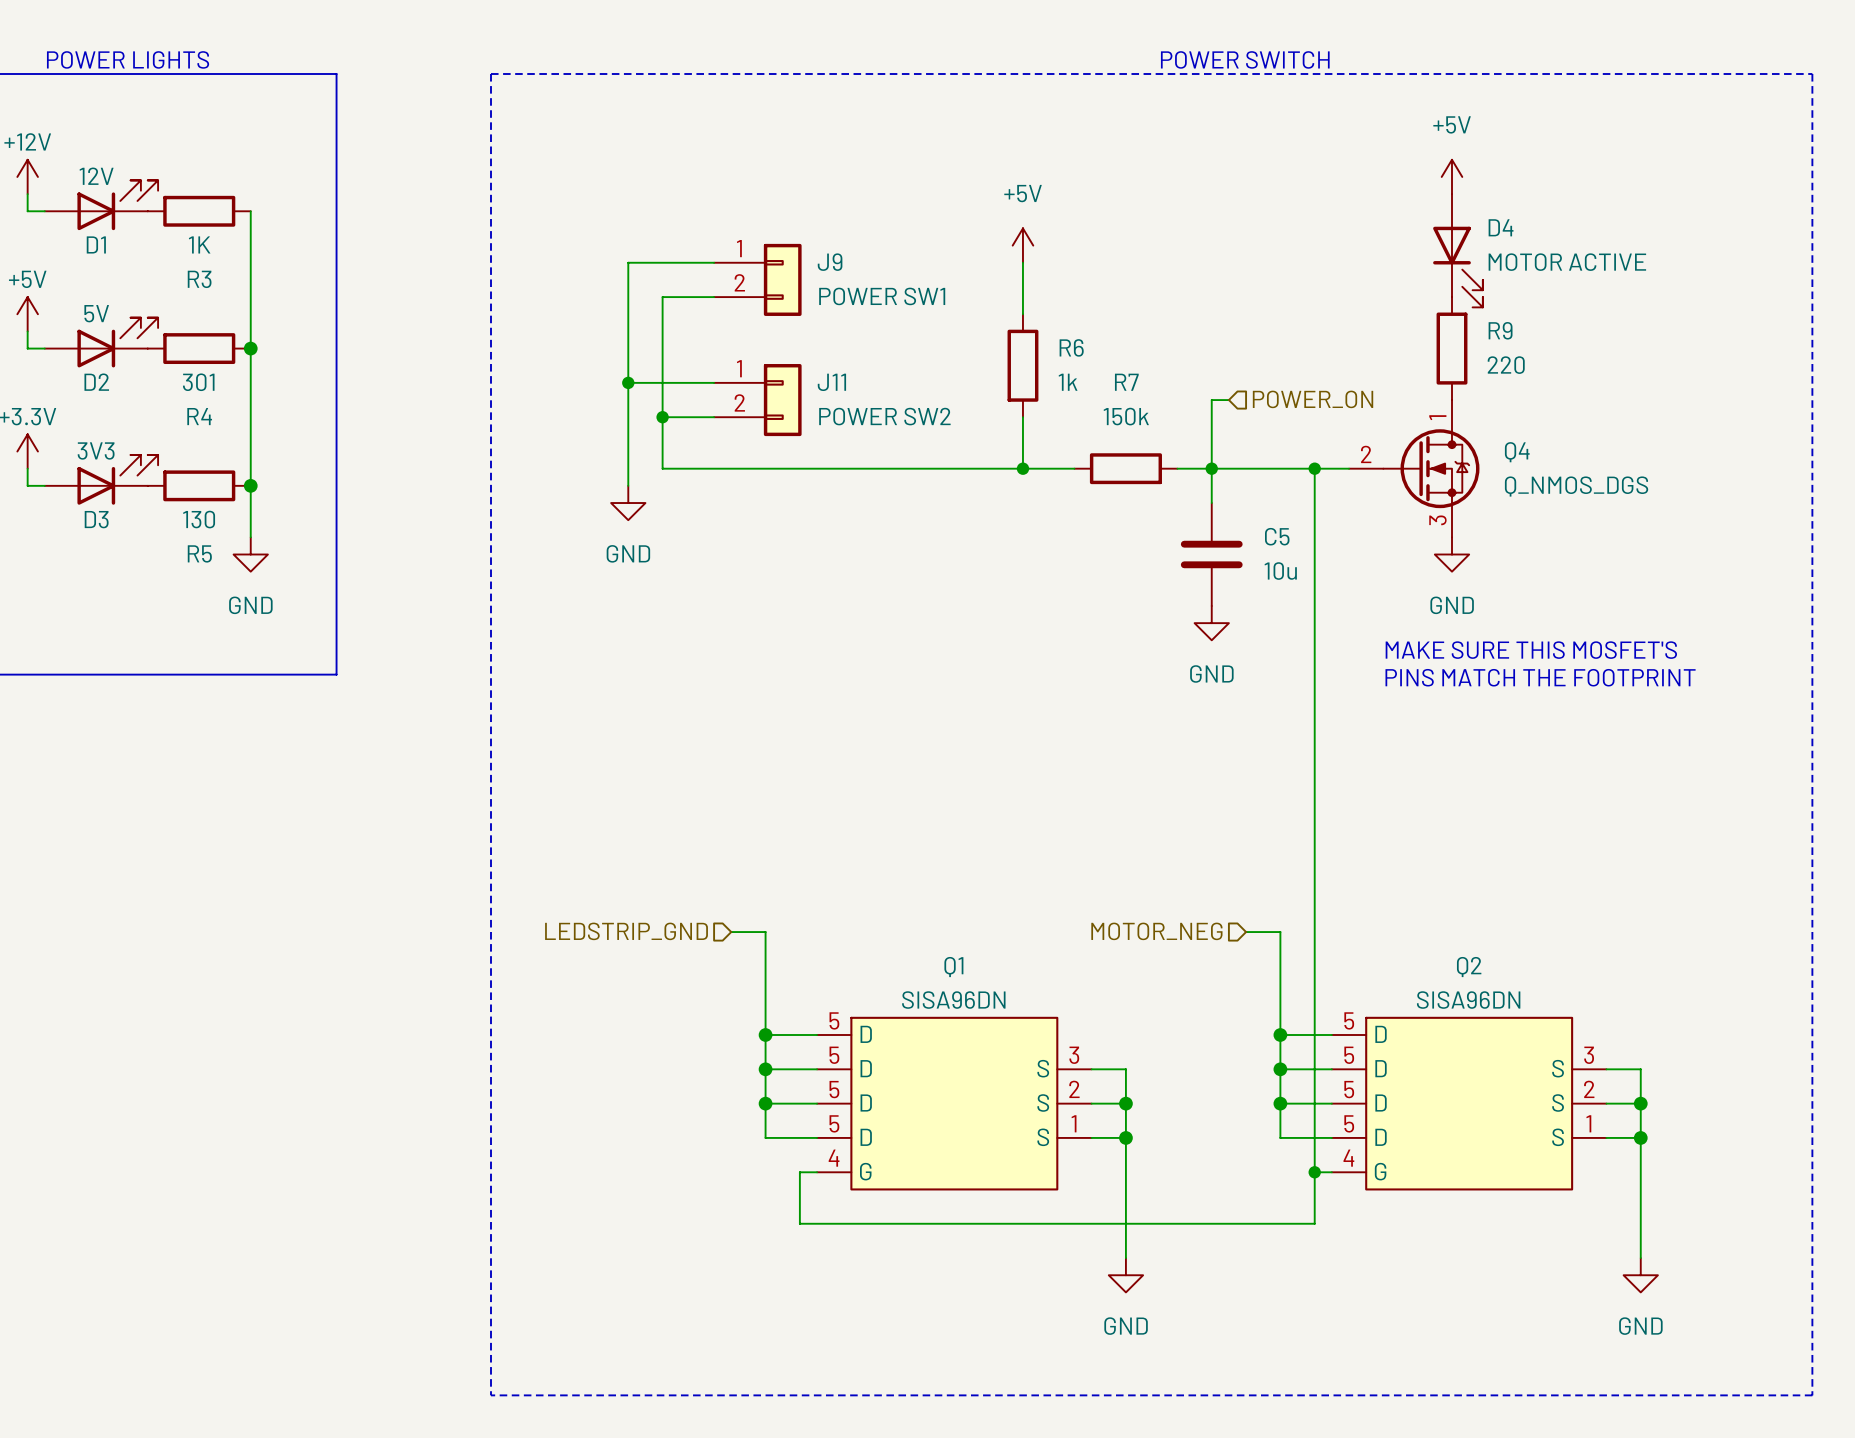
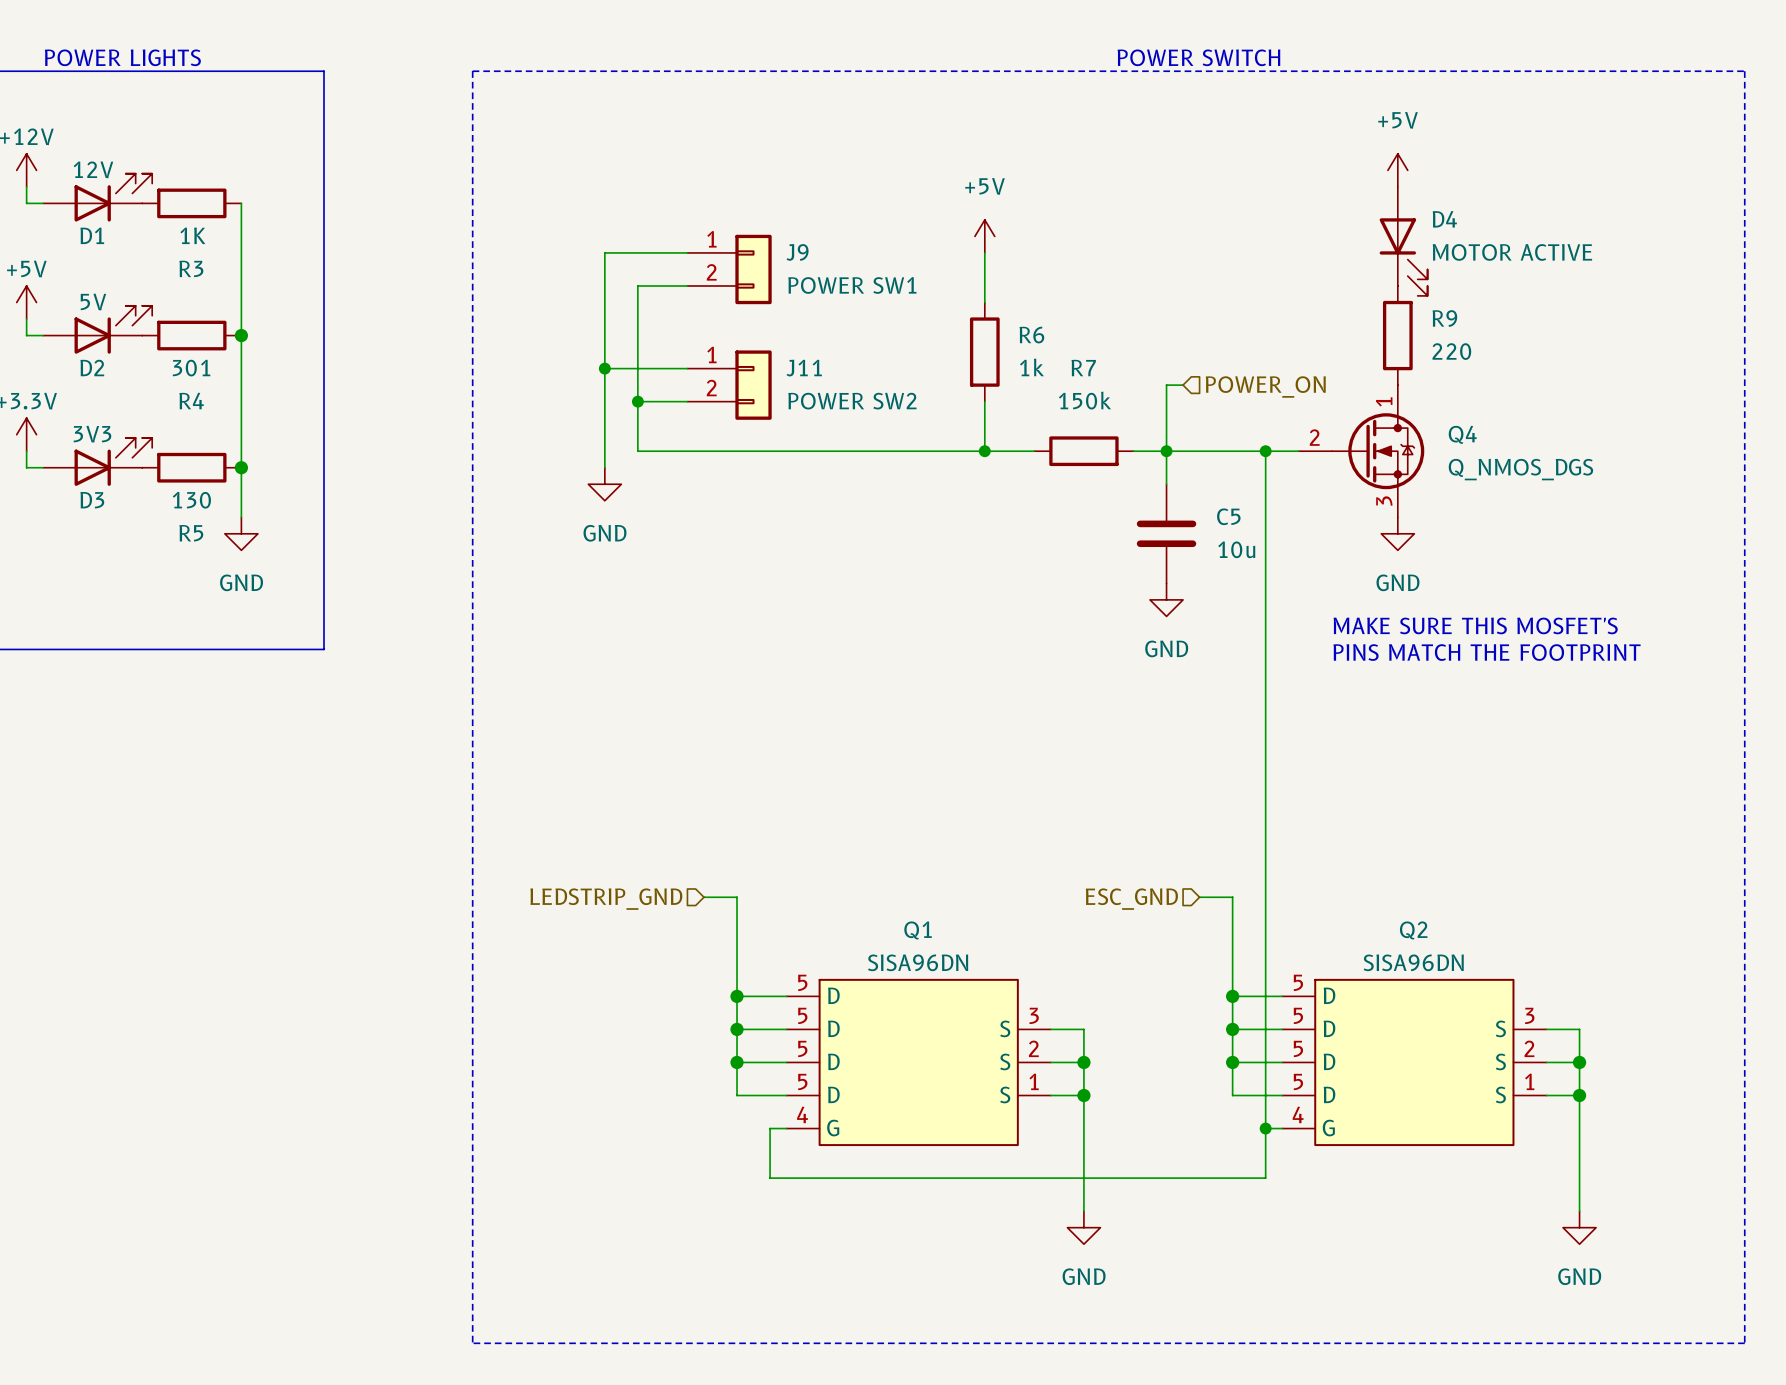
hierarchical label: MOTOR_NEG (1156, 931) -> ESC_GND (1131, 899)

